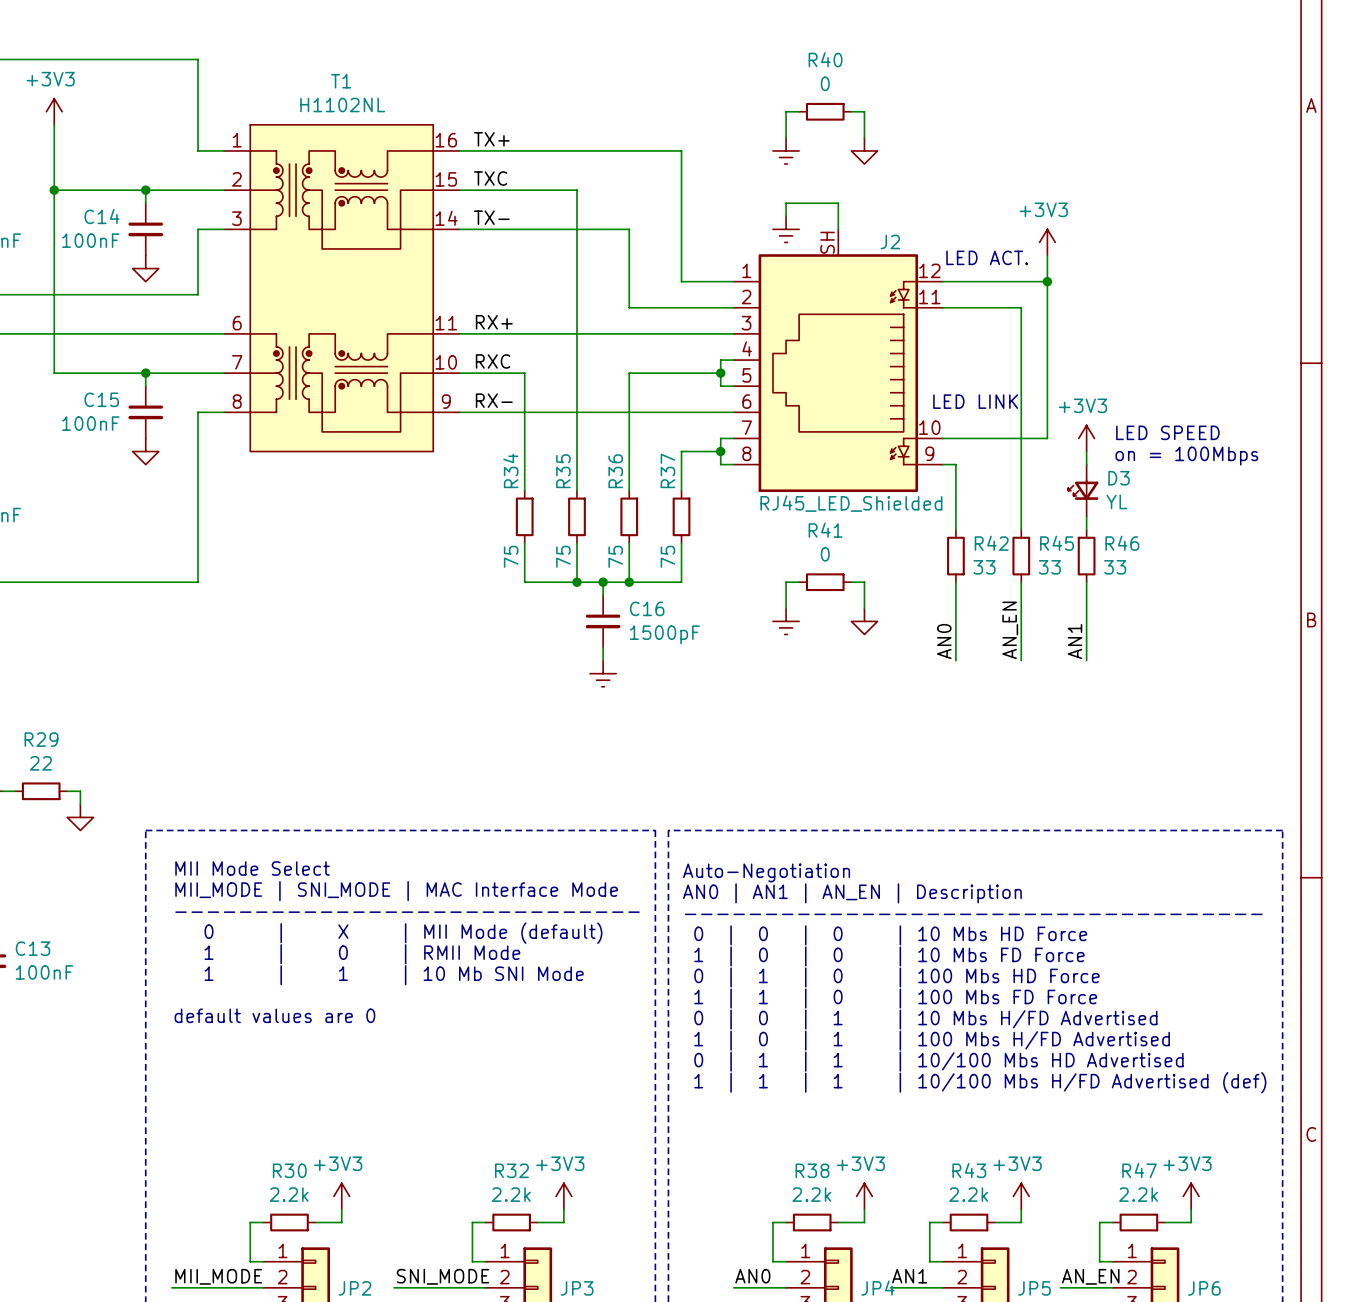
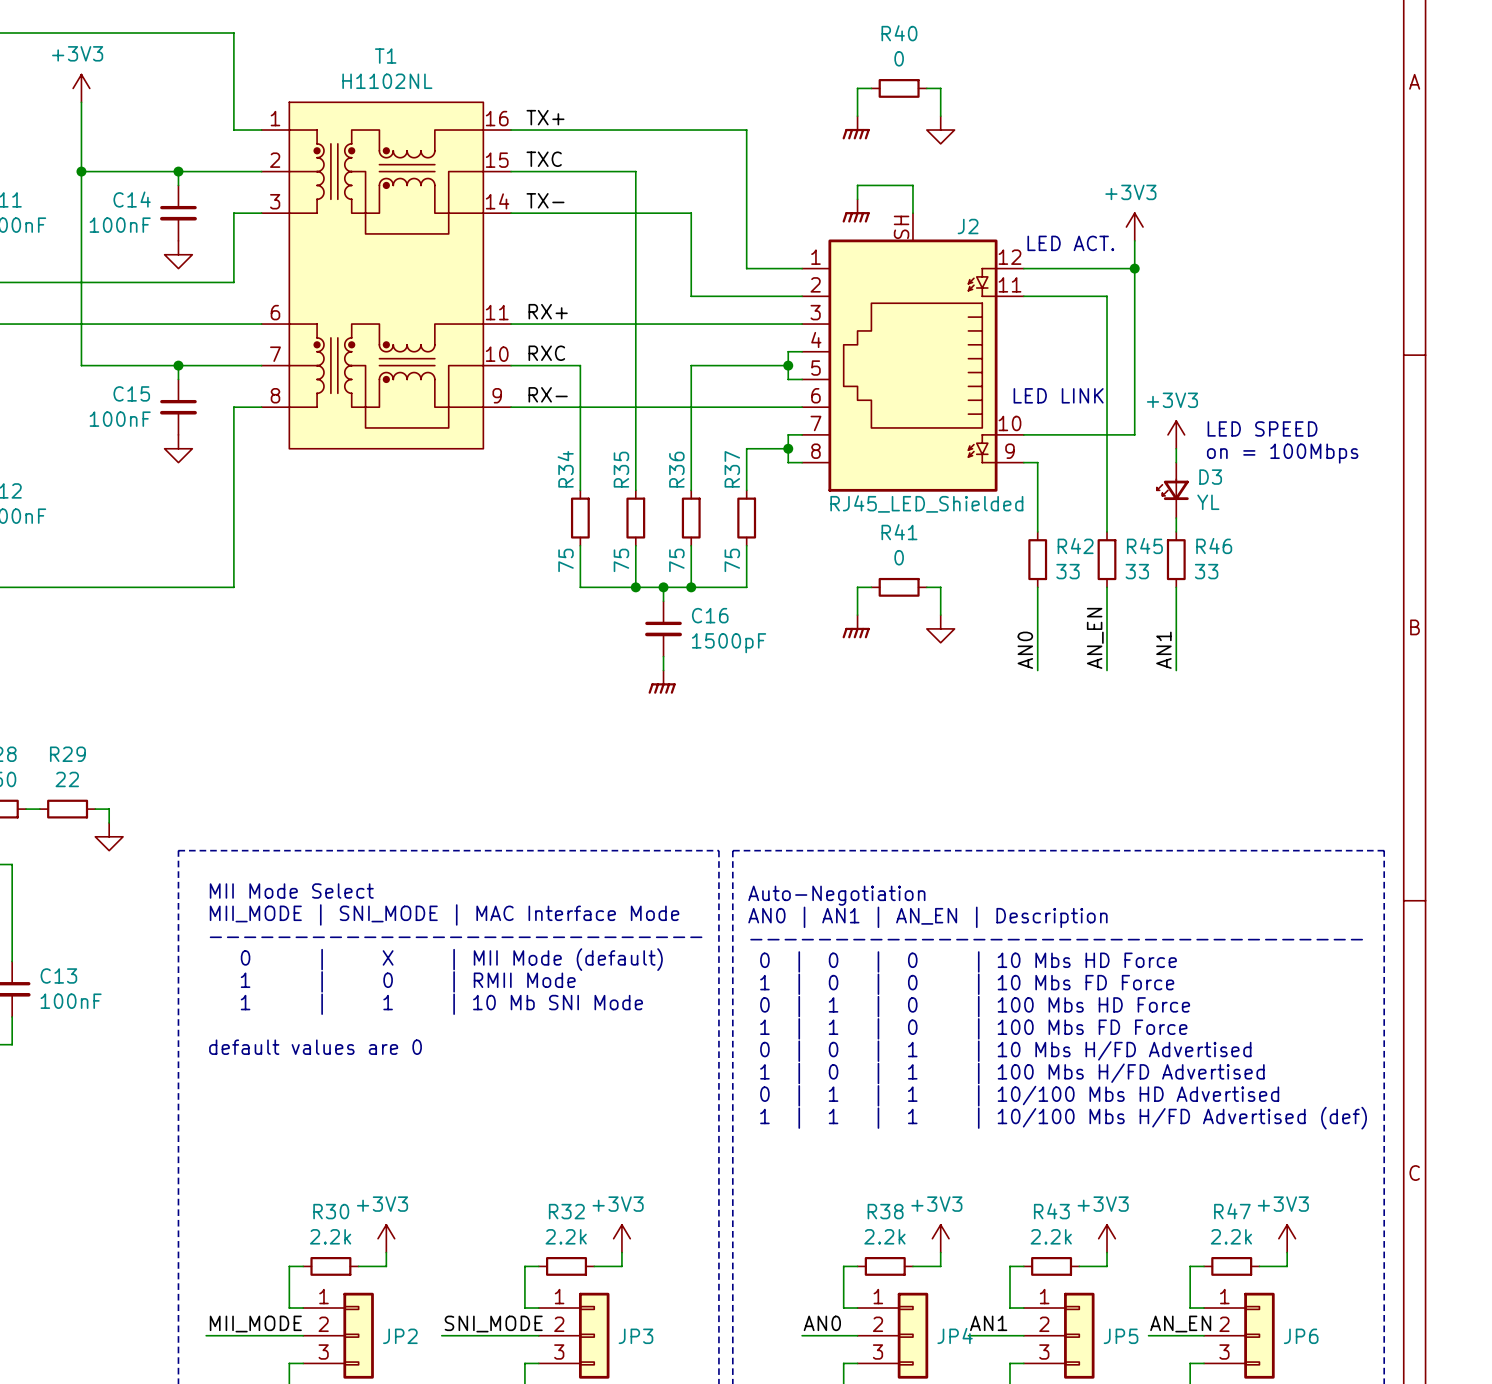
power symbol shape: [772, 137, 800, 165] -> [842, 116, 870, 140]
power symbol shape: [772, 216, 800, 243] -> [842, 199, 870, 223]
power symbol shape: [772, 608, 800, 635] -> [842, 615, 870, 639]
power symbol shape: [590, 660, 617, 687] -> [648, 670, 676, 694]

